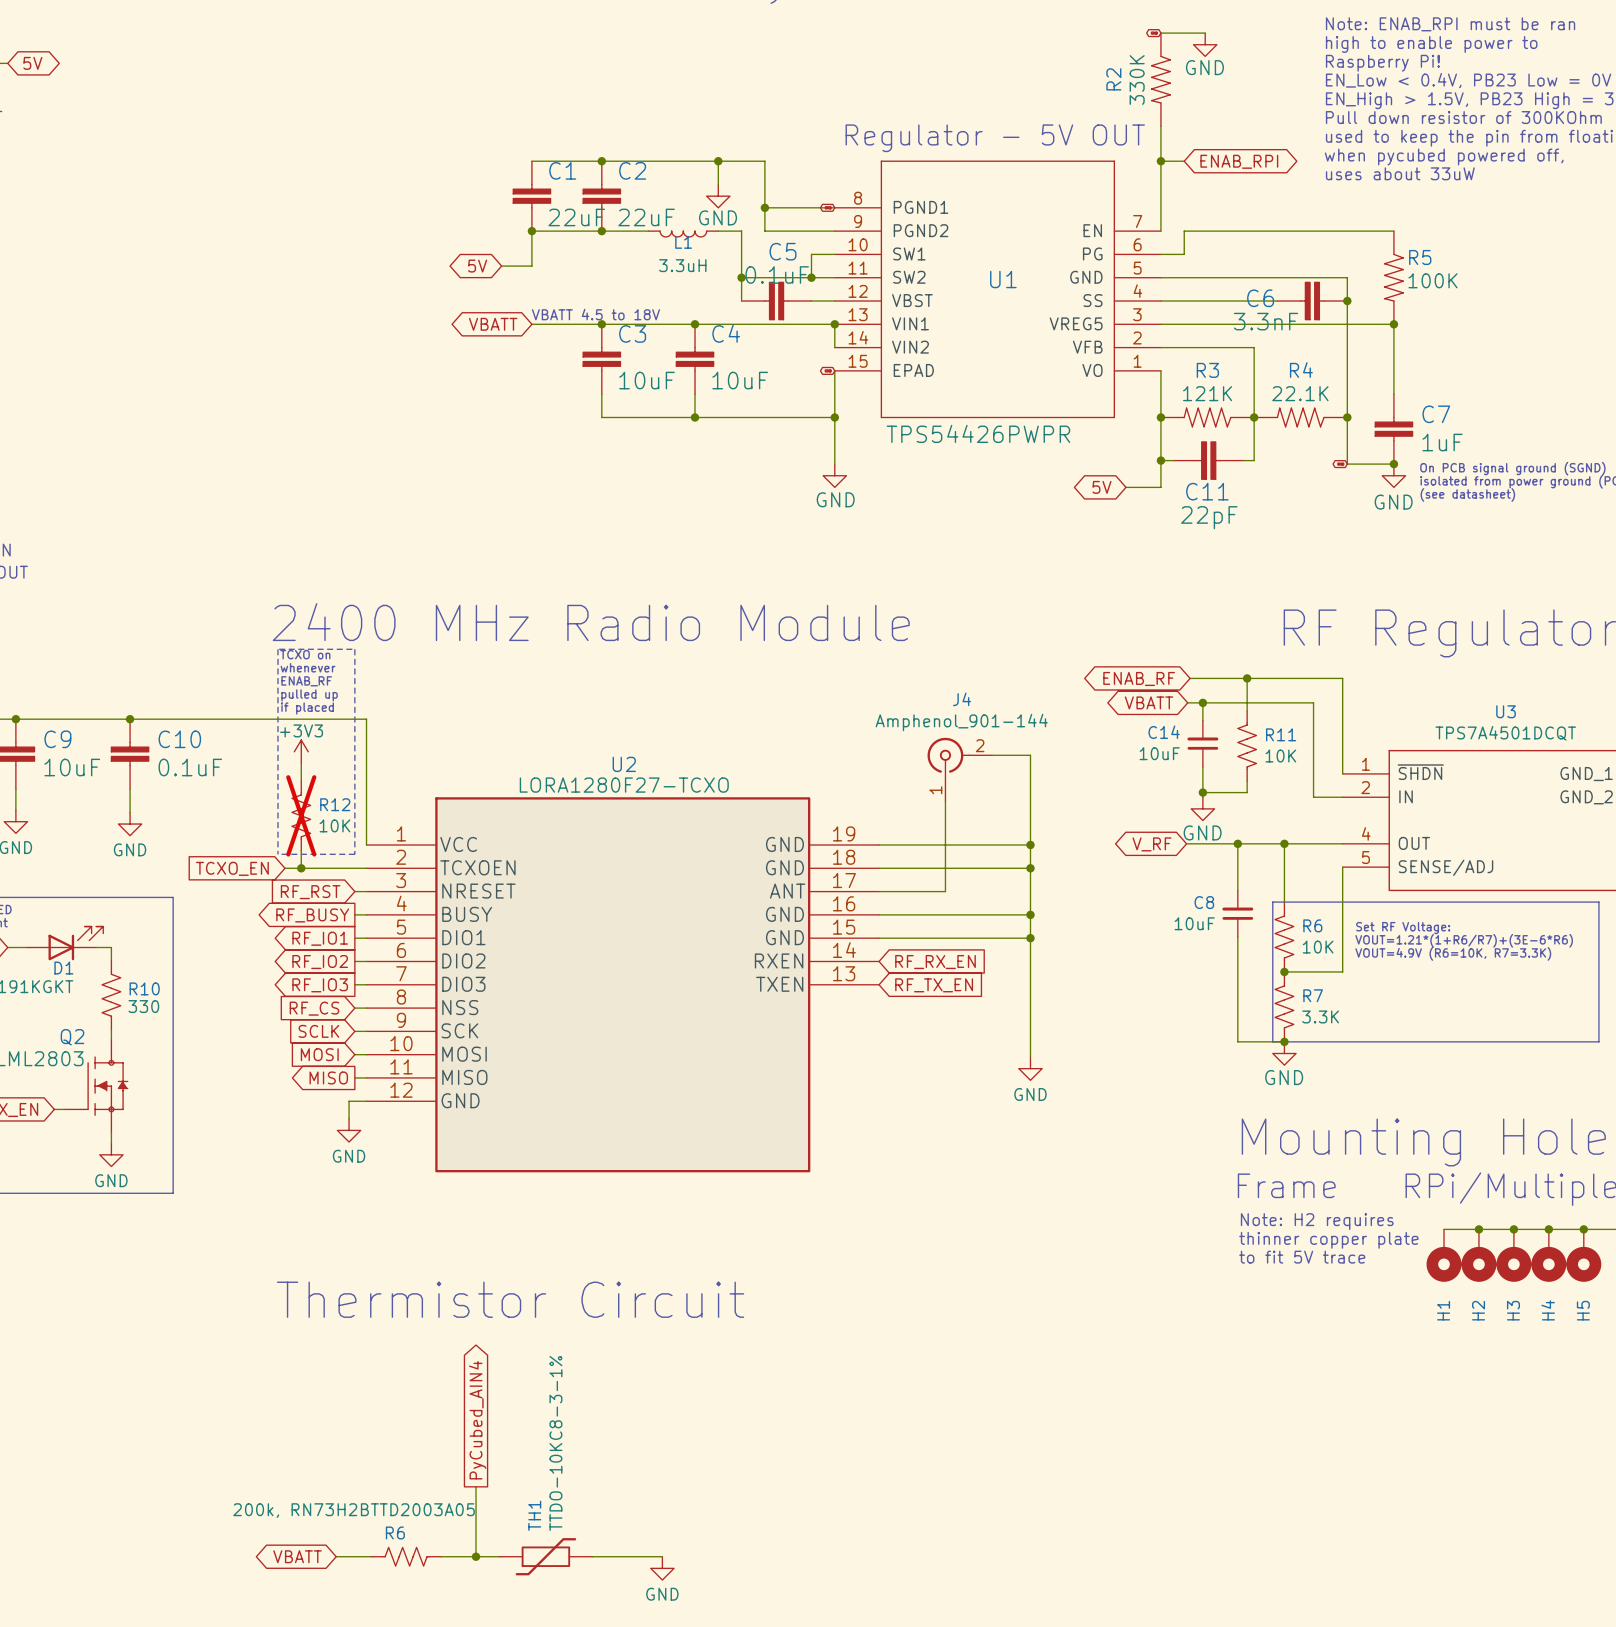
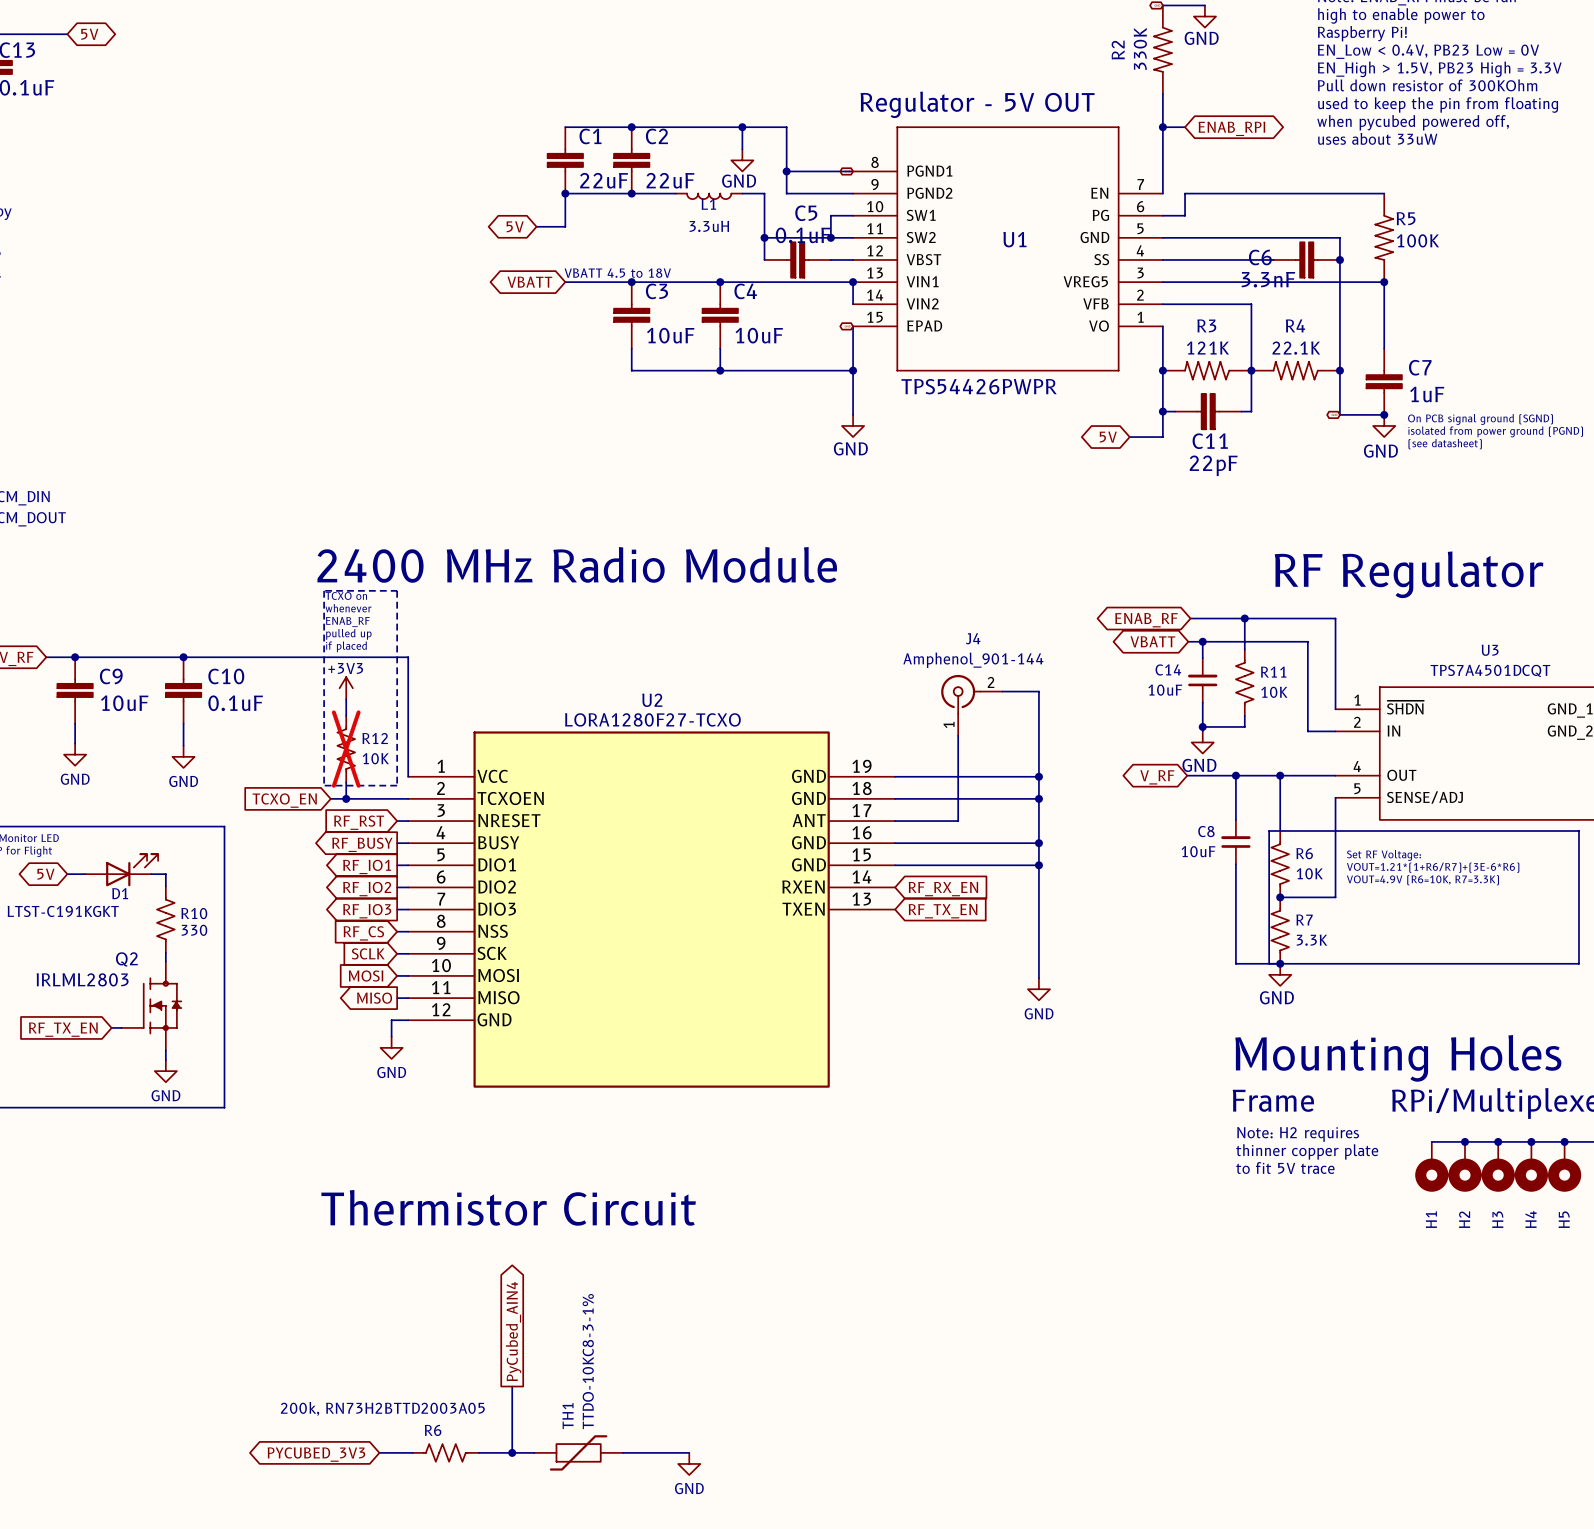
global label: VBATT (297, 1556) -> PYCUBED_3V3 (316, 1454)

